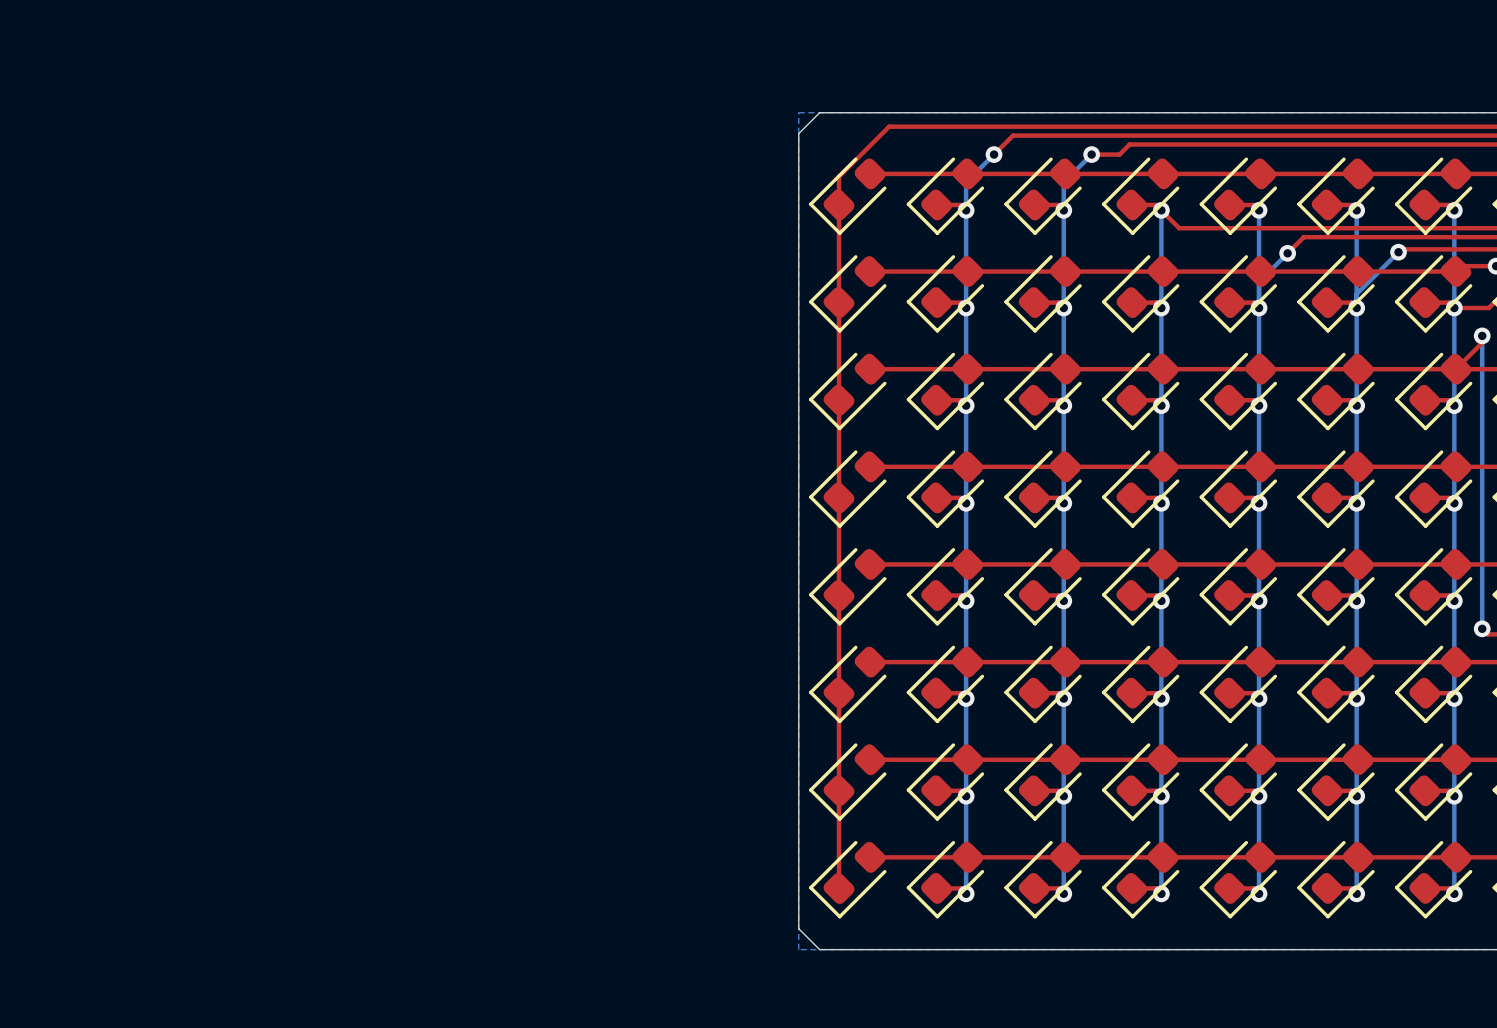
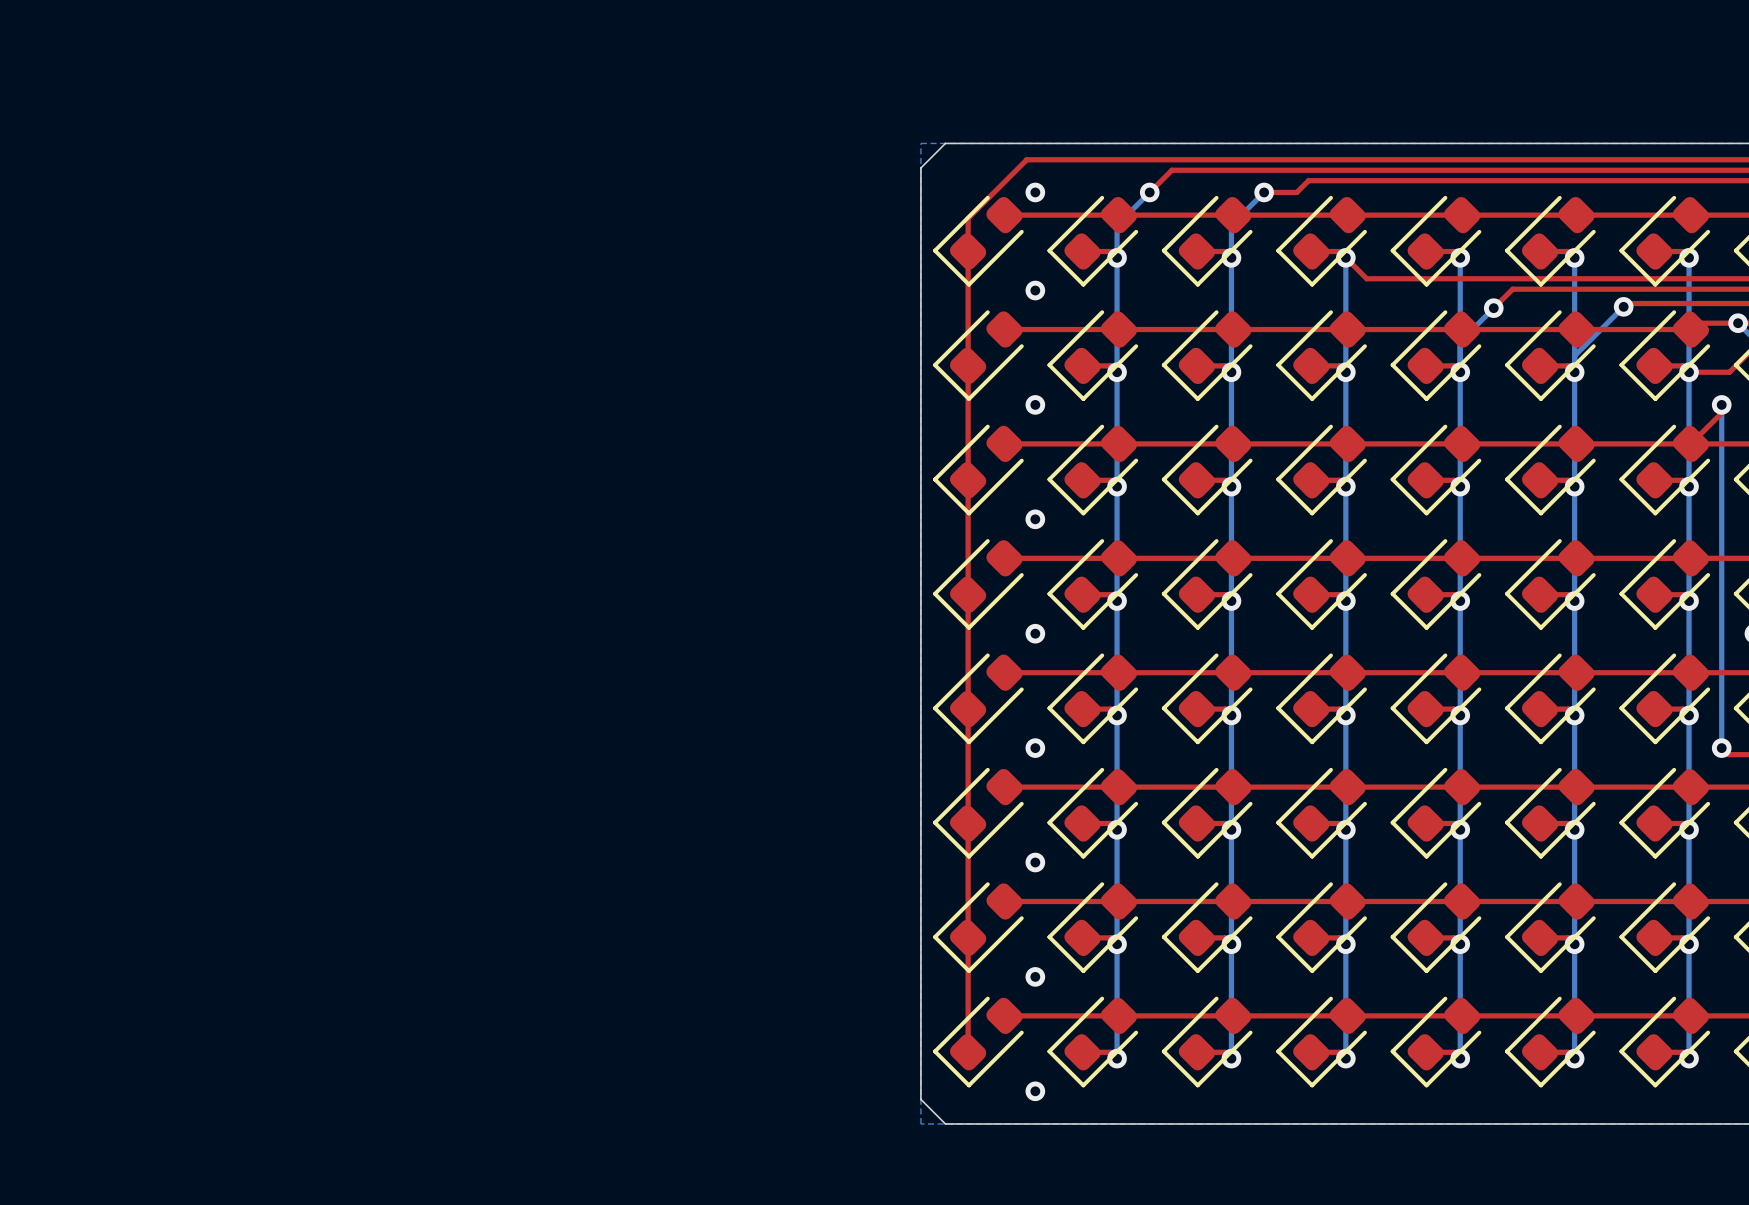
via: none -> (1035, 192)
via: none -> (1035, 290)
via: none -> (1035, 404)
via: none -> (1035, 519)
via: none -> (1035, 633)
via: none -> (1035, 748)
via: none -> (1035, 862)
via: none -> (1035, 976)
via: none -> (1035, 1091)

